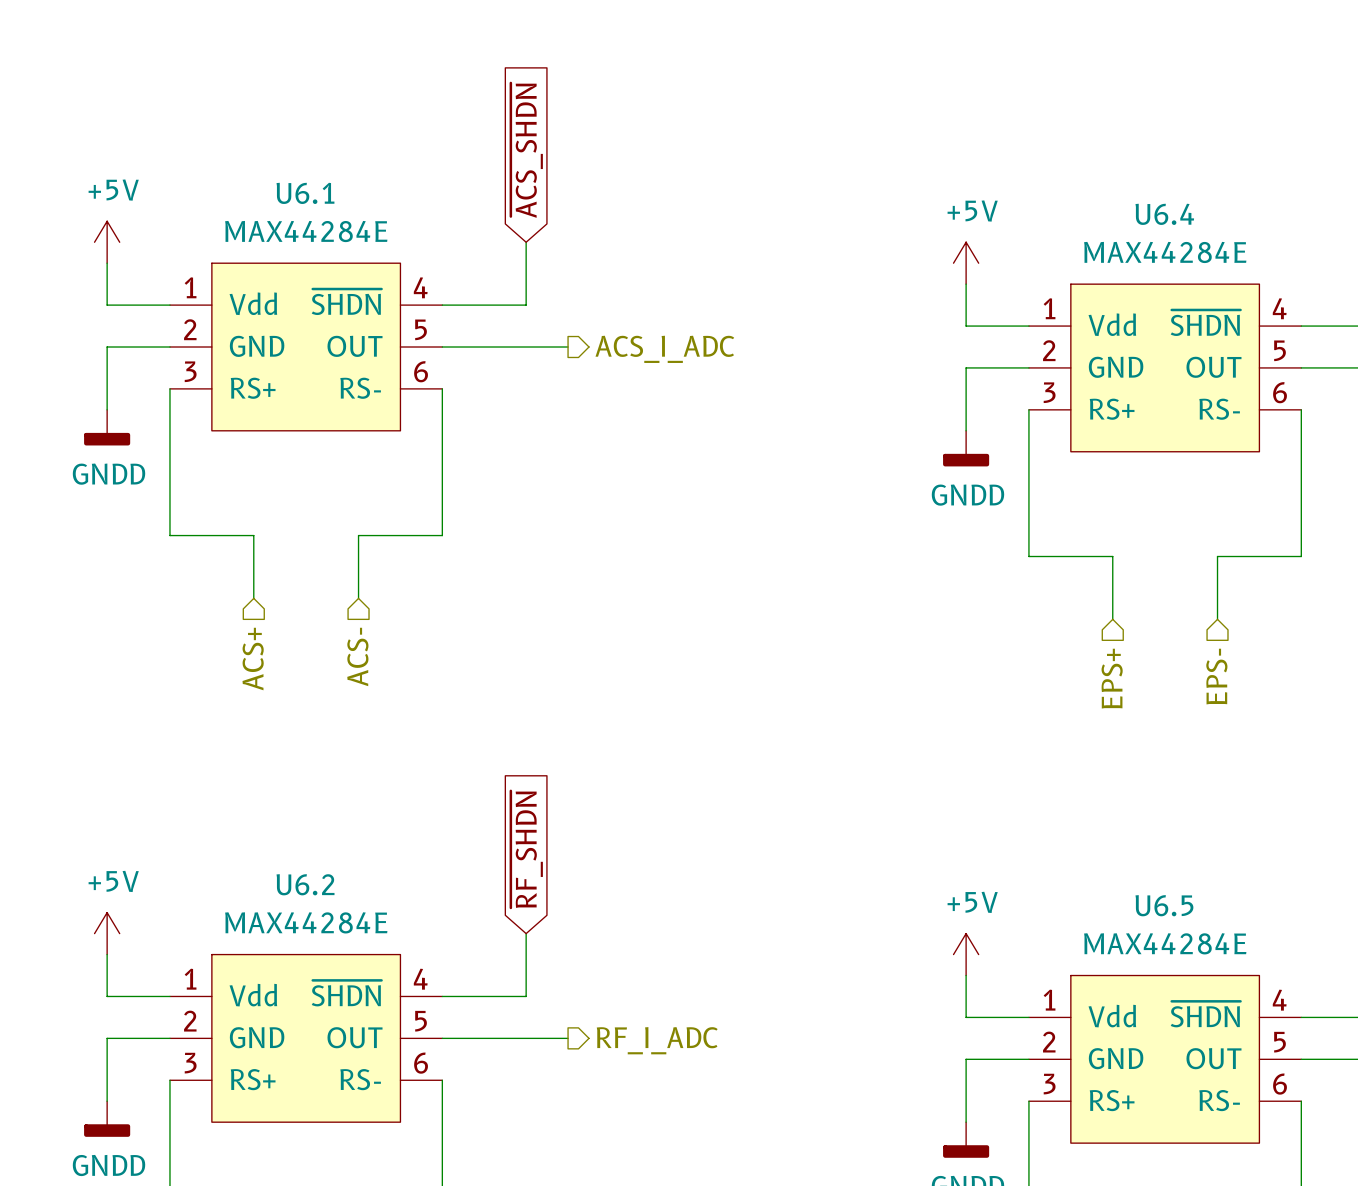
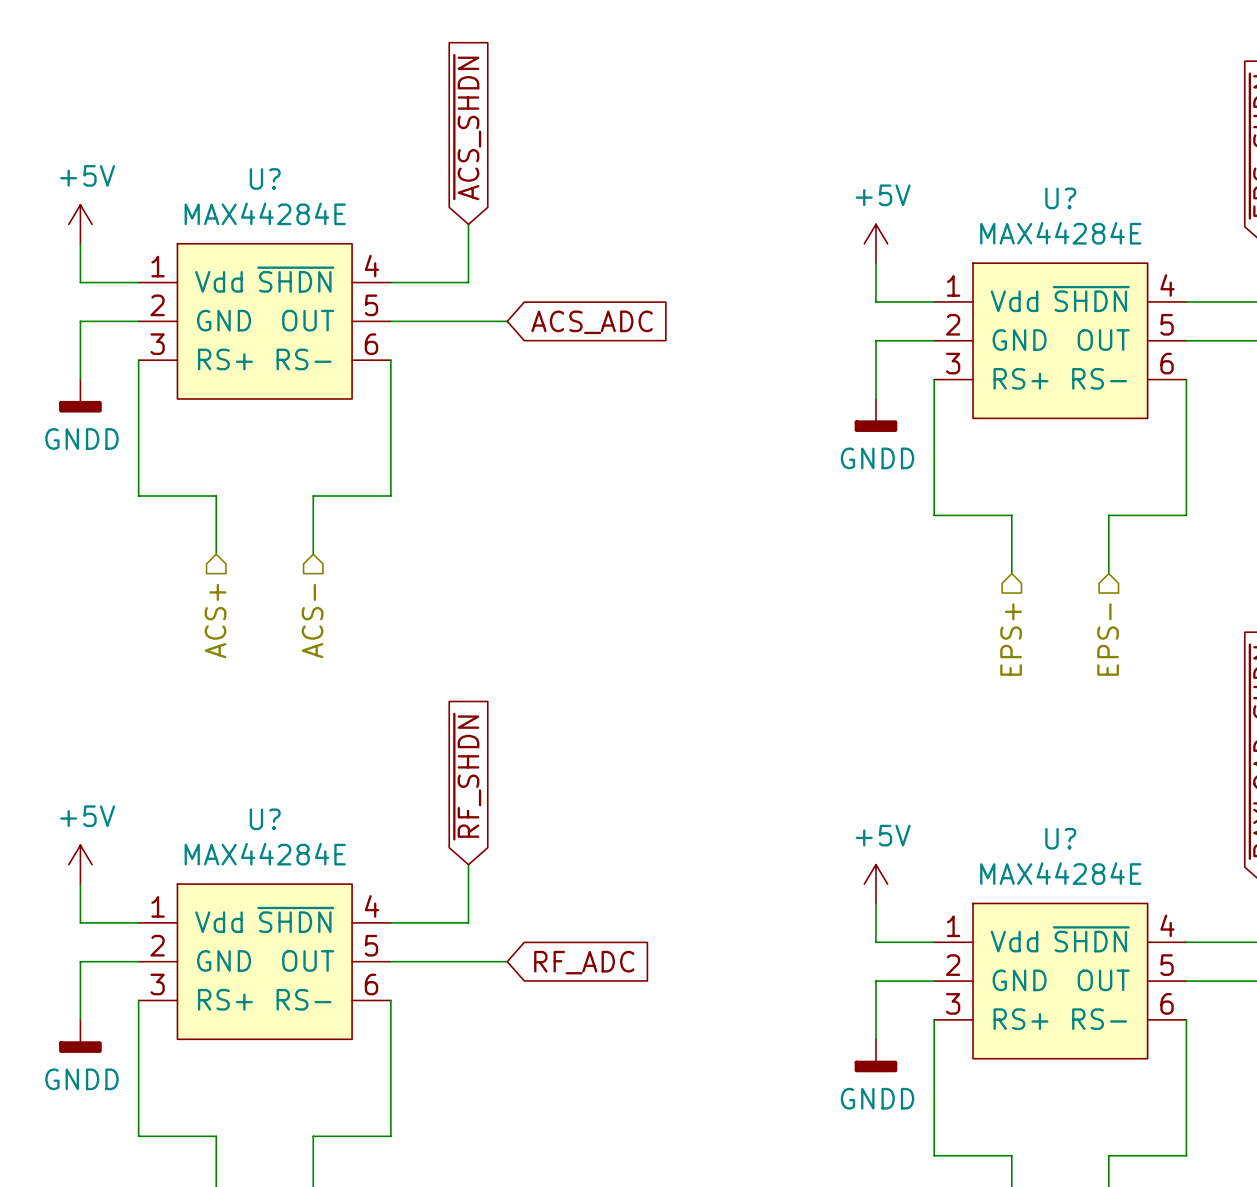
U6.1 name: U6.1 (305, 193) -> U? (265, 179)
U6.4 name: U6.4 (1164, 214) -> U? (1060, 198)
hierarchical label: ACS_I_ADC (664, 349) -> none
global label: none -> ACS_ADC (592, 322)
U6.2 name: U6.2 (305, 884) -> U? (265, 819)
U6.5 name: U6.5 (1164, 905) -> U? (1060, 838)
hierarchical label: RF_I_ADC (657, 1040) -> none
global label: none -> RF_ADC (584, 962)

